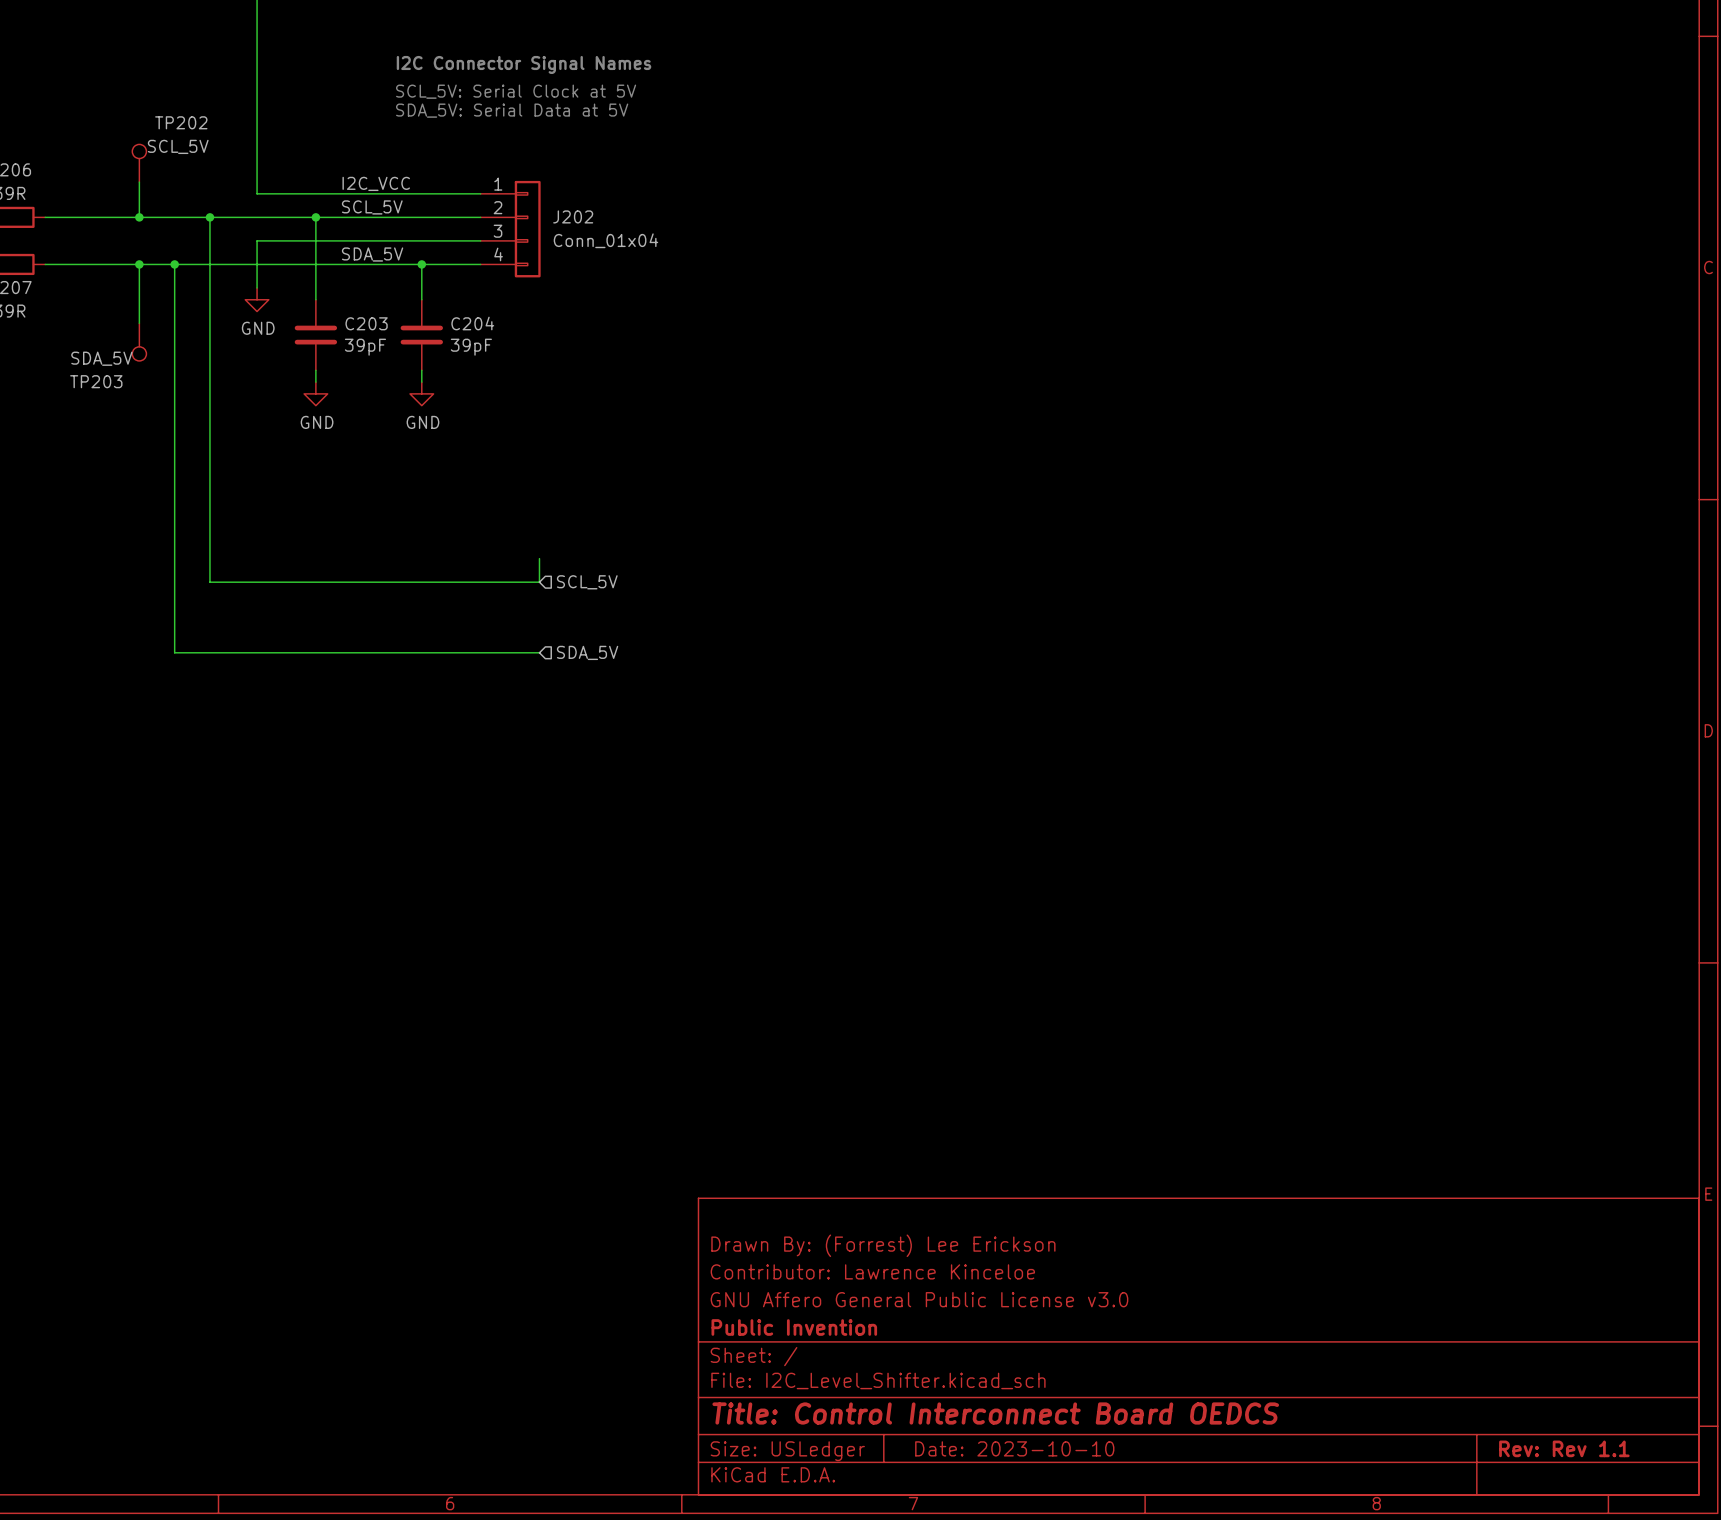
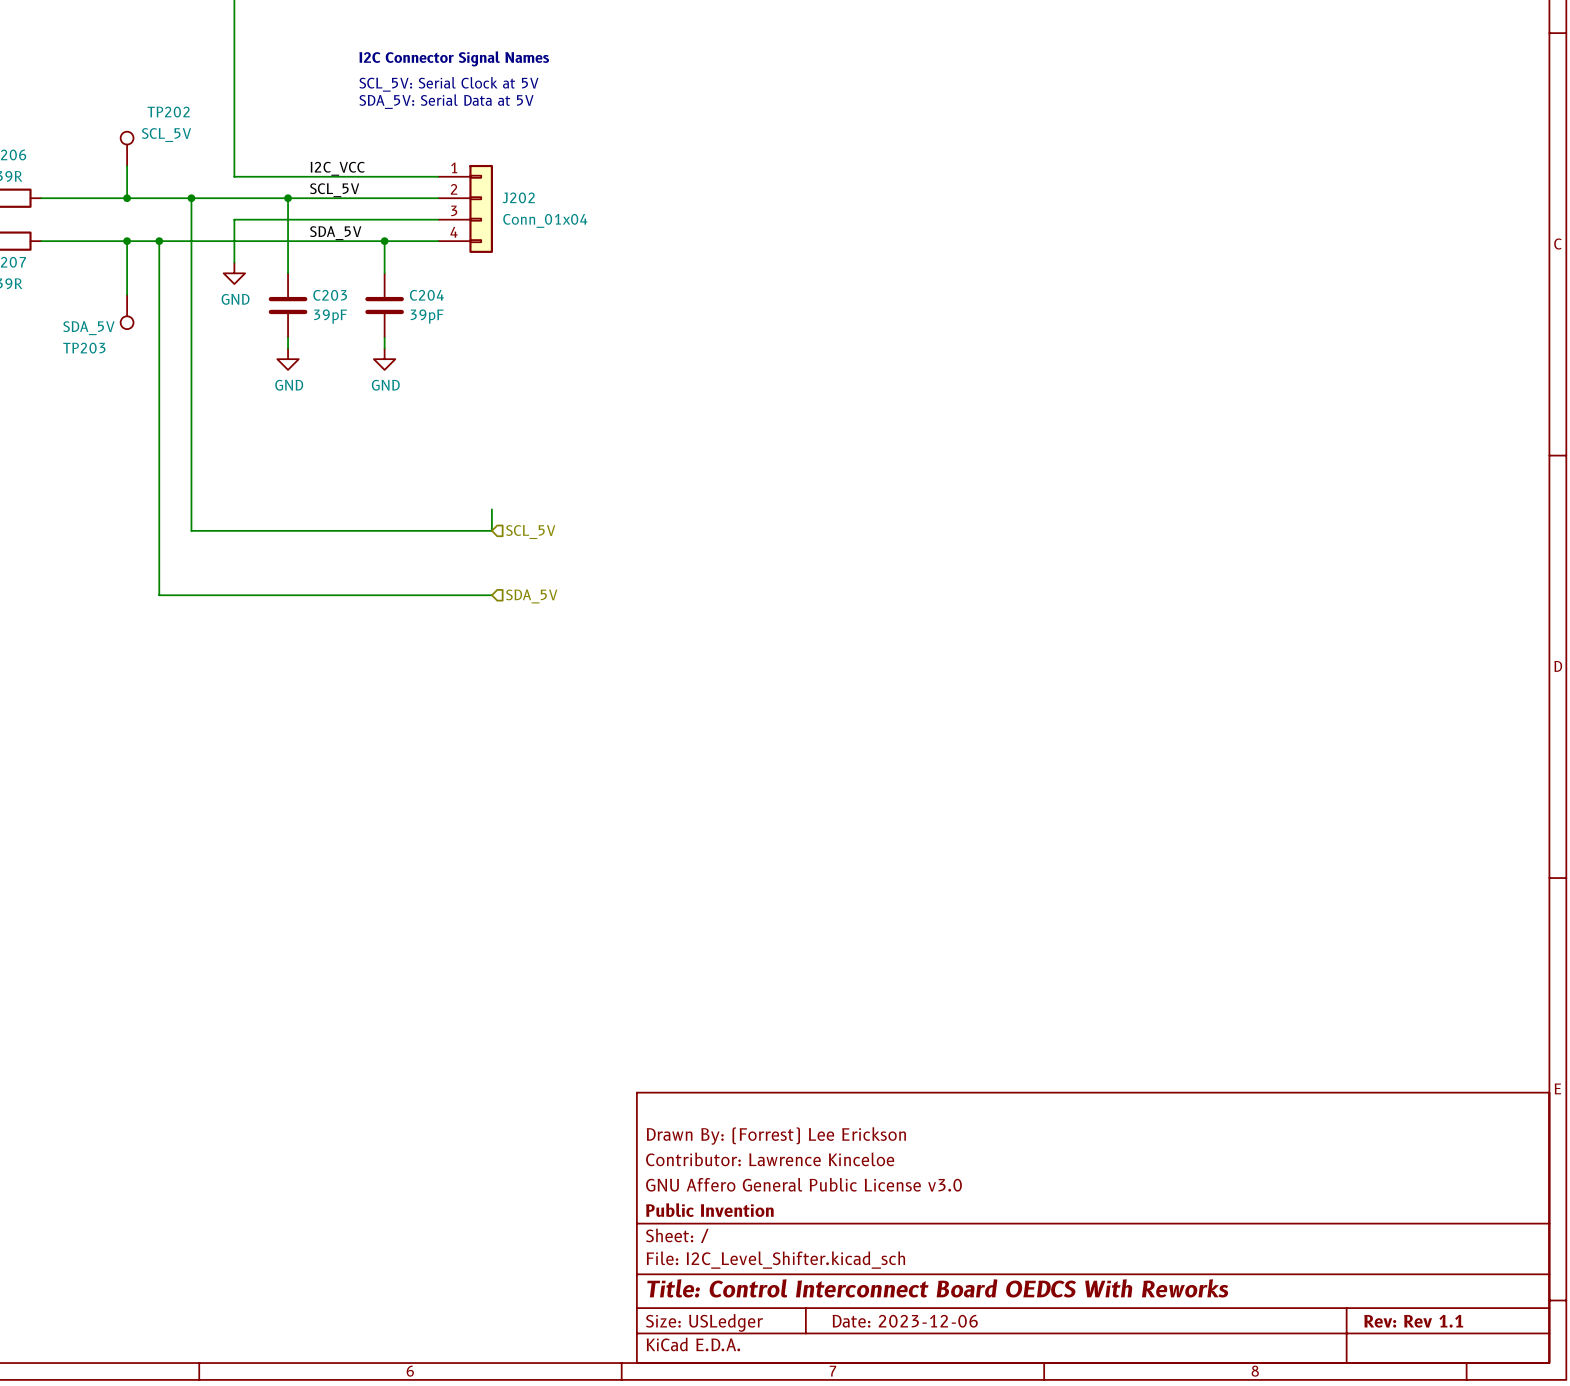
title block: Title: Control Interconnect Board OEDCS (995, 1413) -> Title: Control Interconnect Board OEDCS With Reworks (937, 1288)
title block: Date: 2023-10-10 (1014, 1448) -> Date: 2023-12-06 (905, 1321)

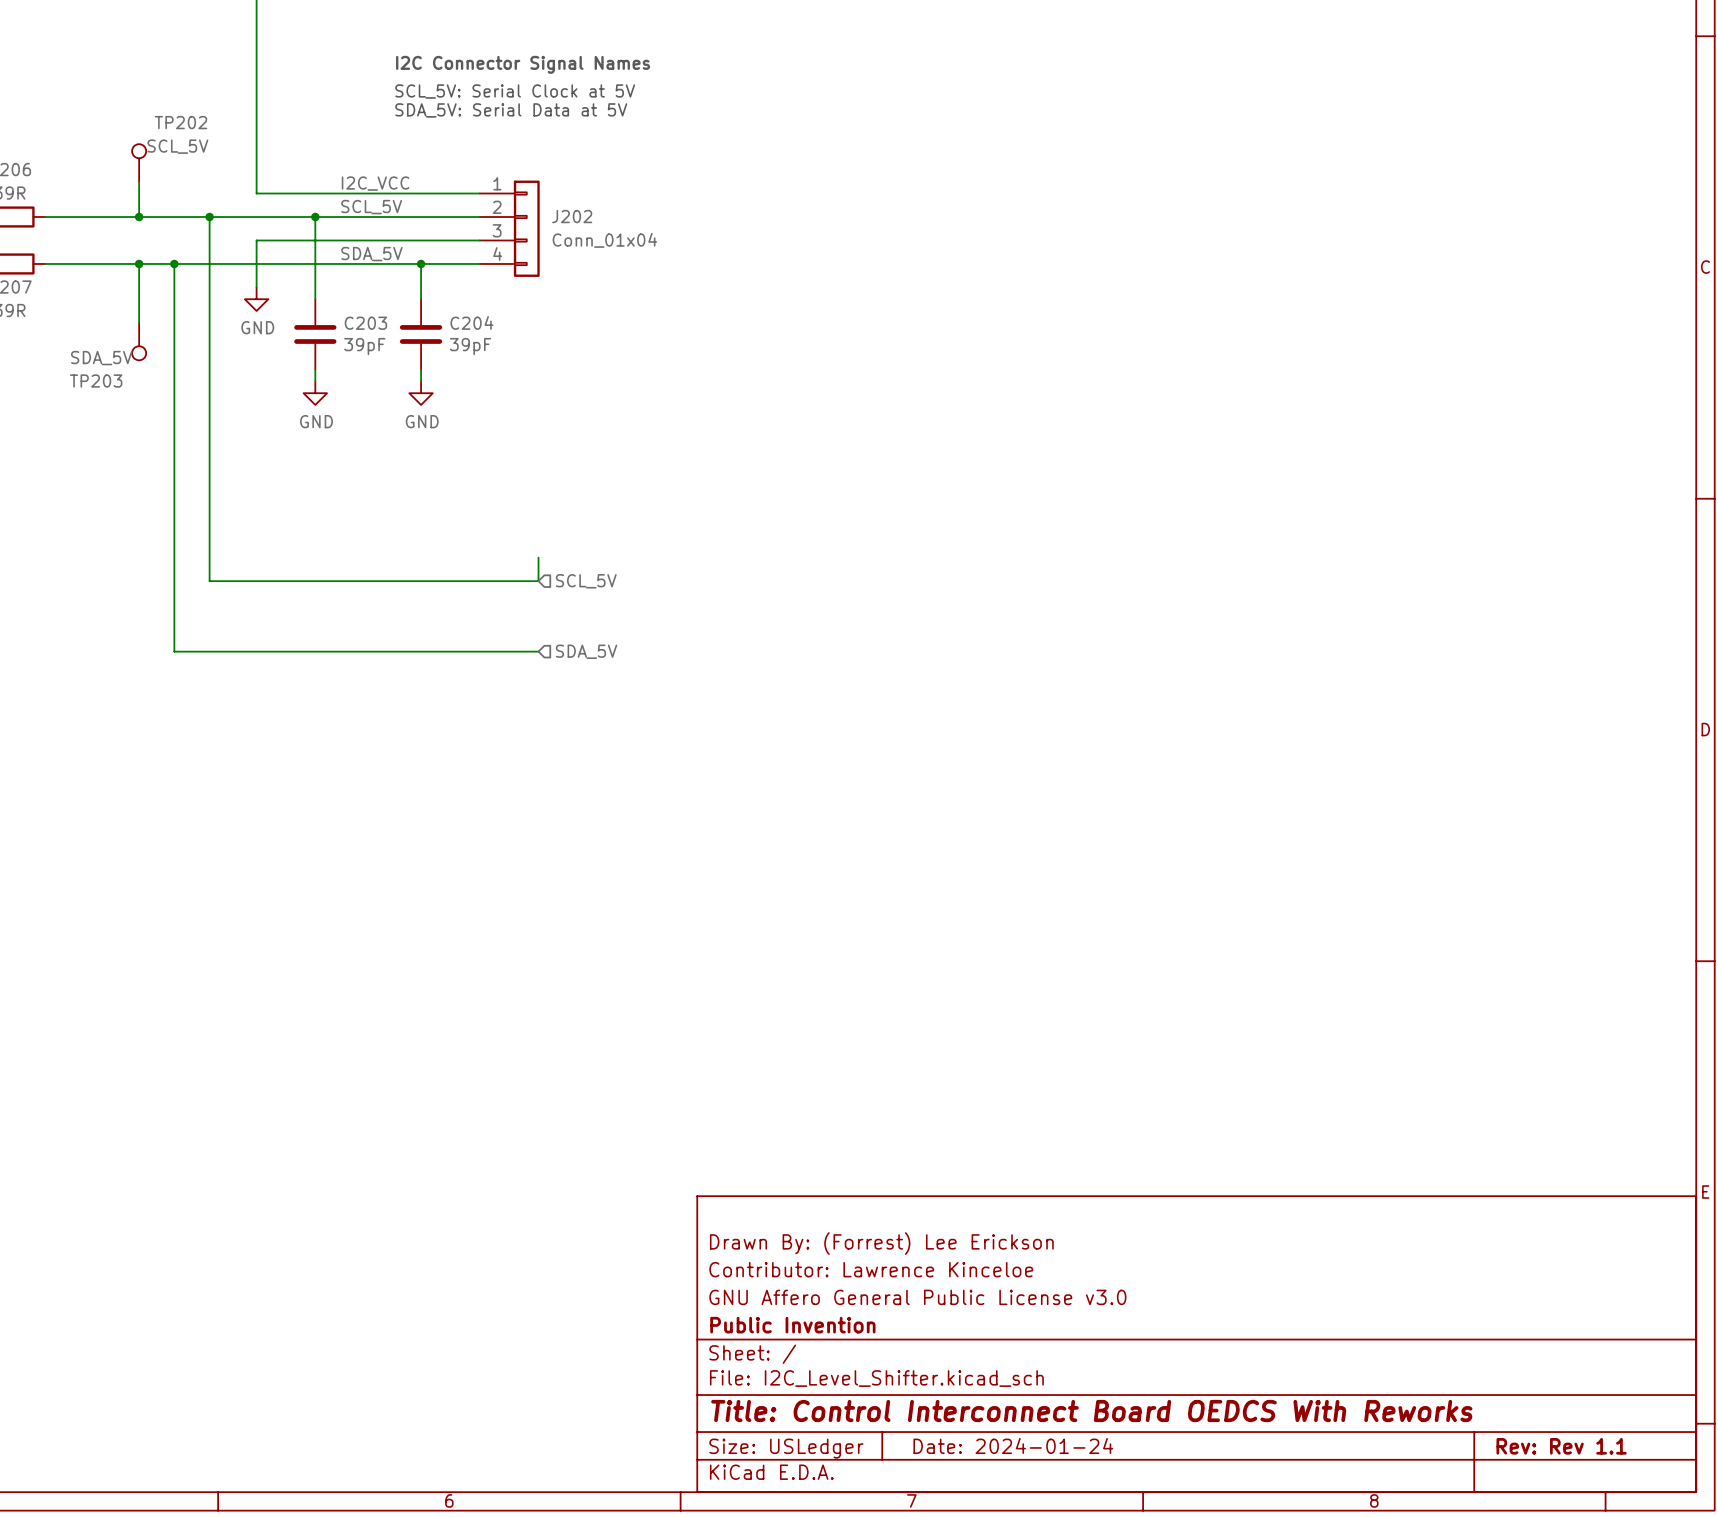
title block: Date: 2023-12-06 (905, 1321) -> Date: 2024-01-24 (1013, 1445)

